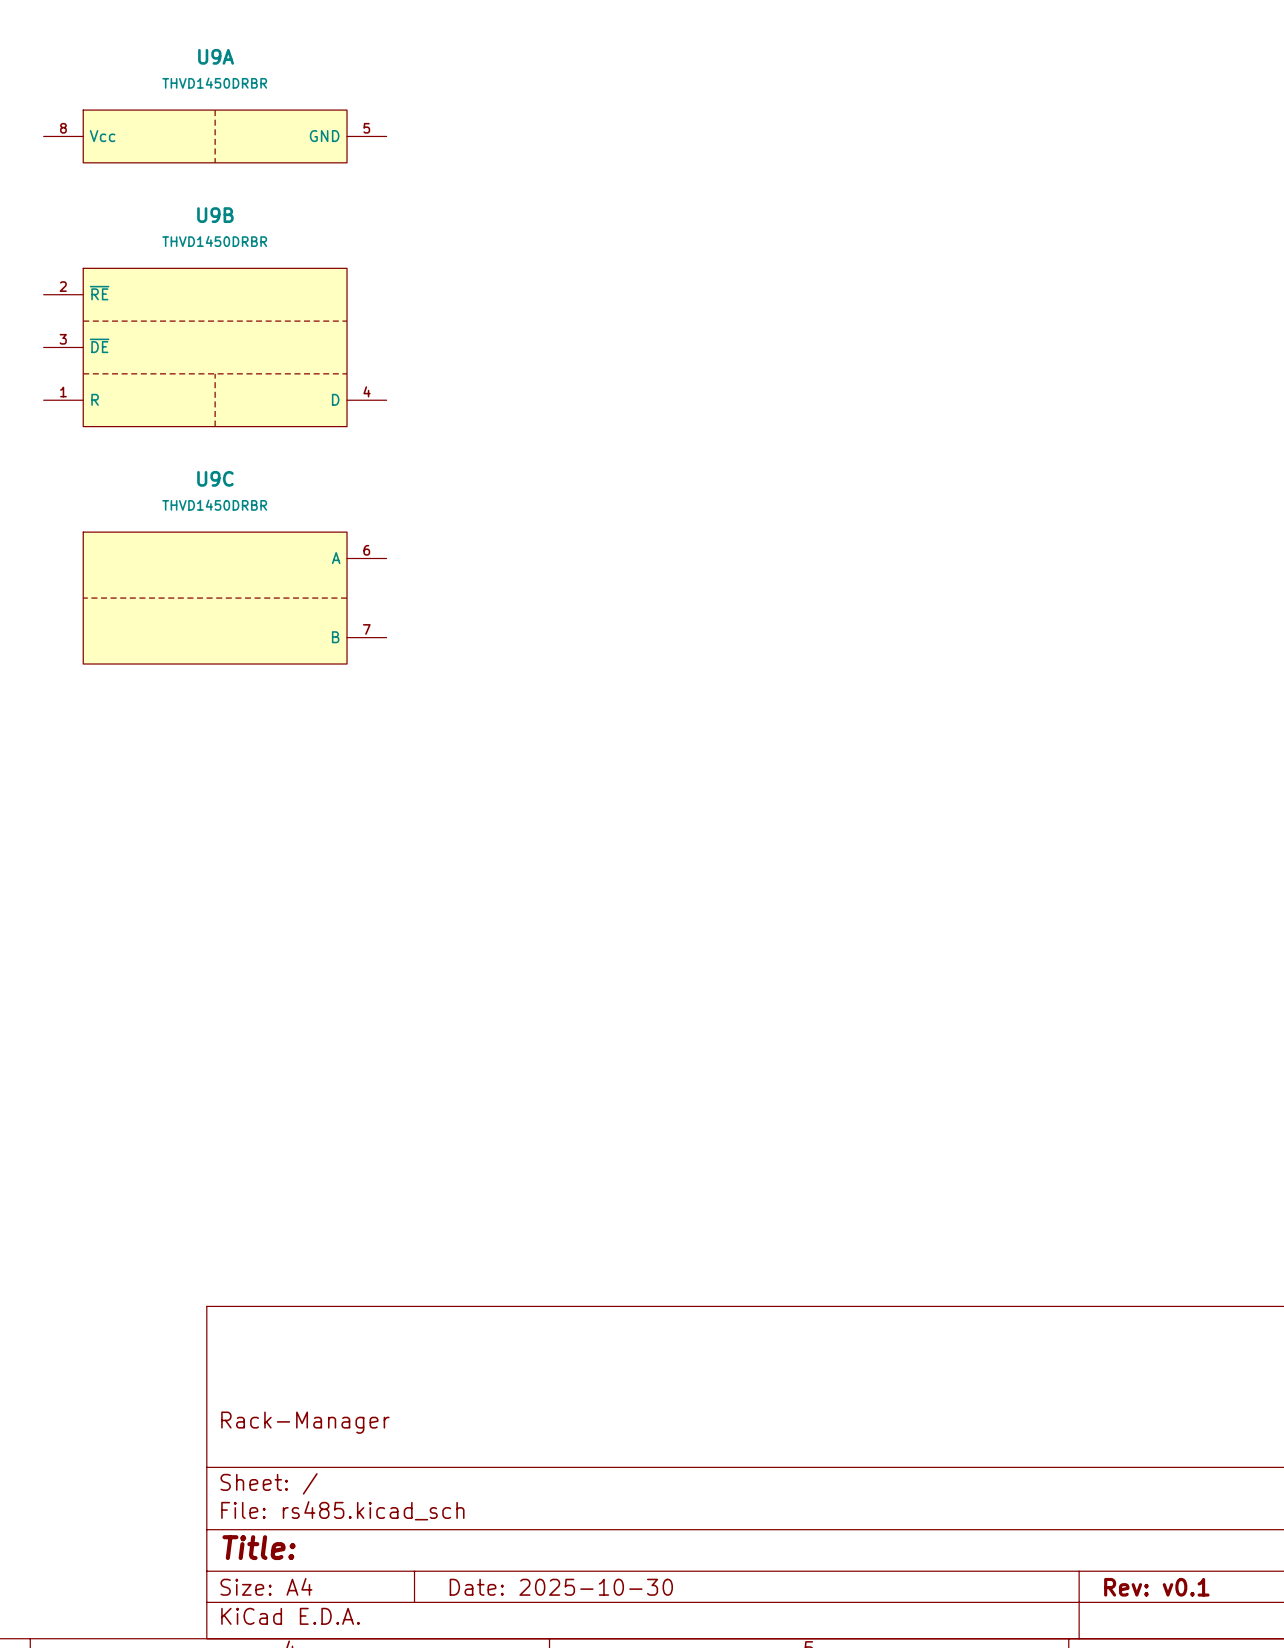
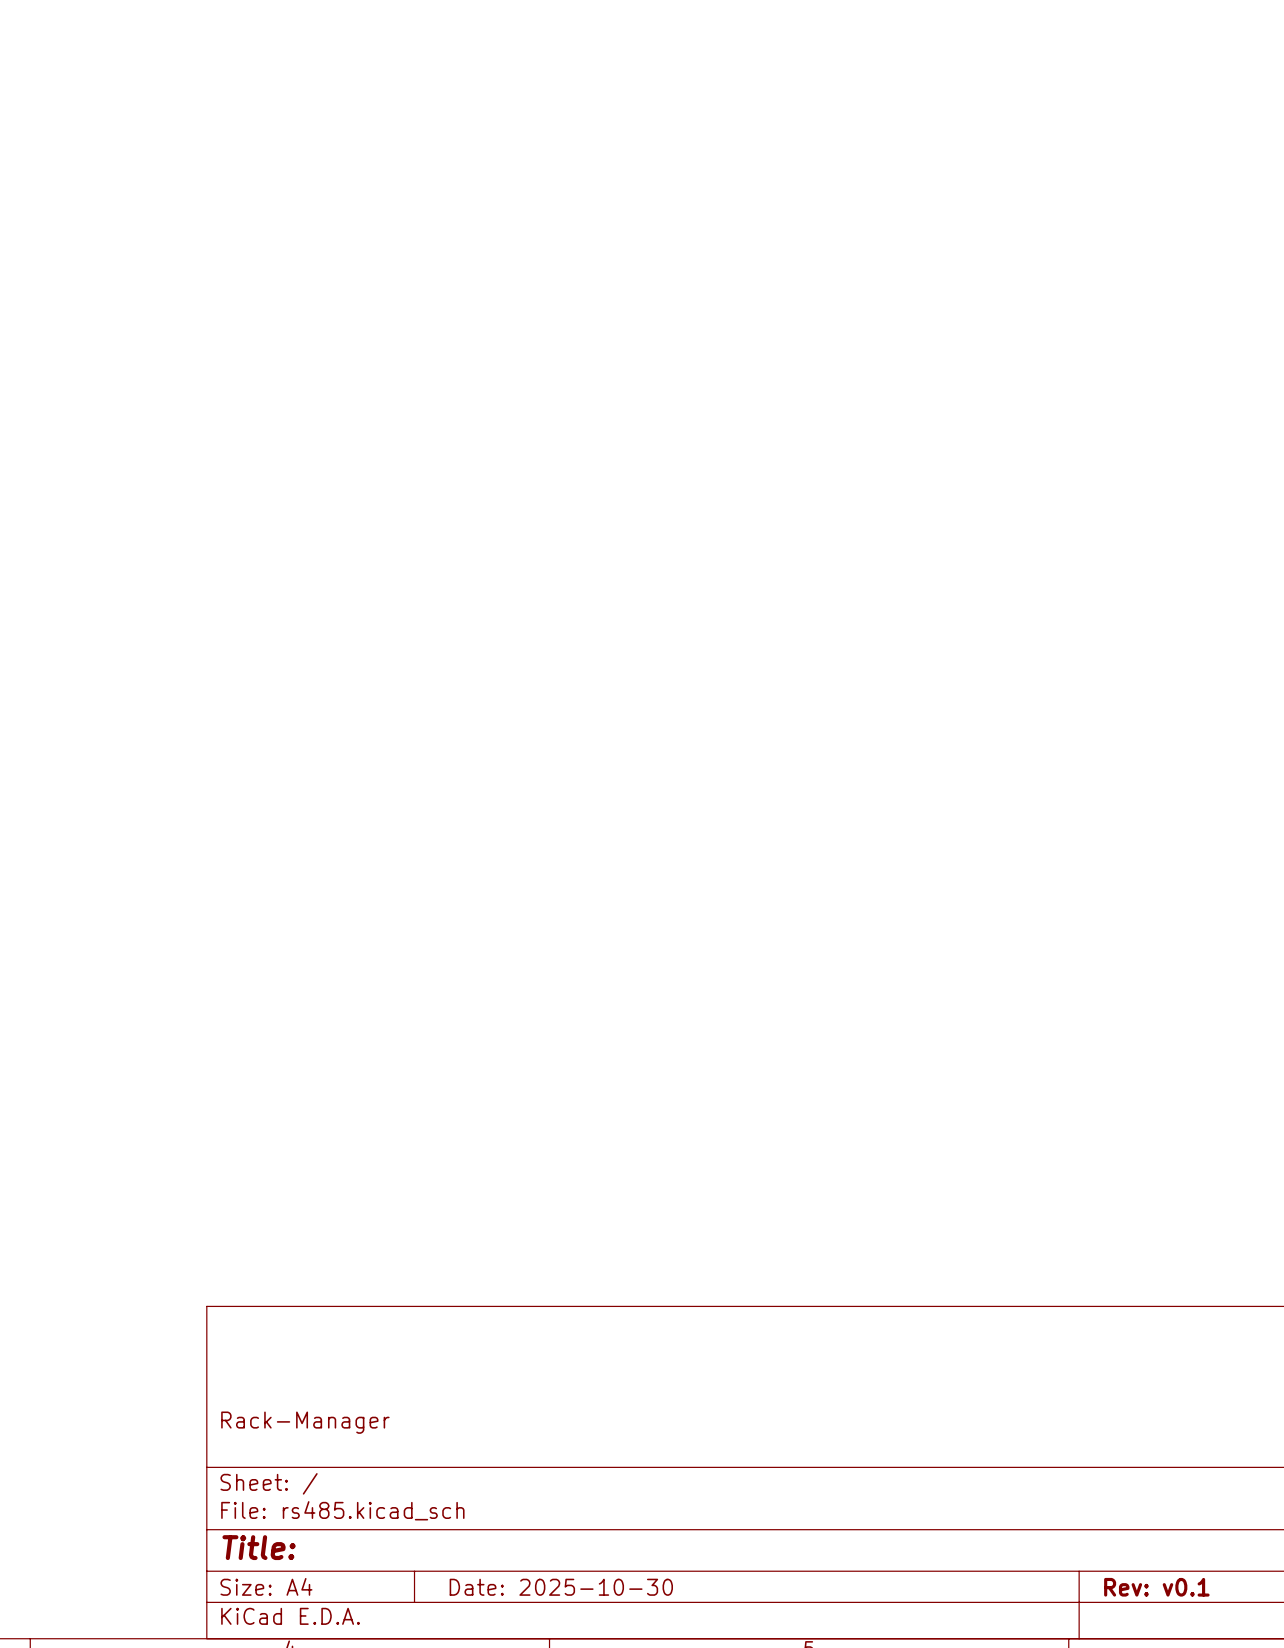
U9A: THVD1450DRBR (215, 136) -> none
U9B: THVD1450DRBR (215, 347) -> none
U9C: THVD1450DRBR (234, 598) -> none

